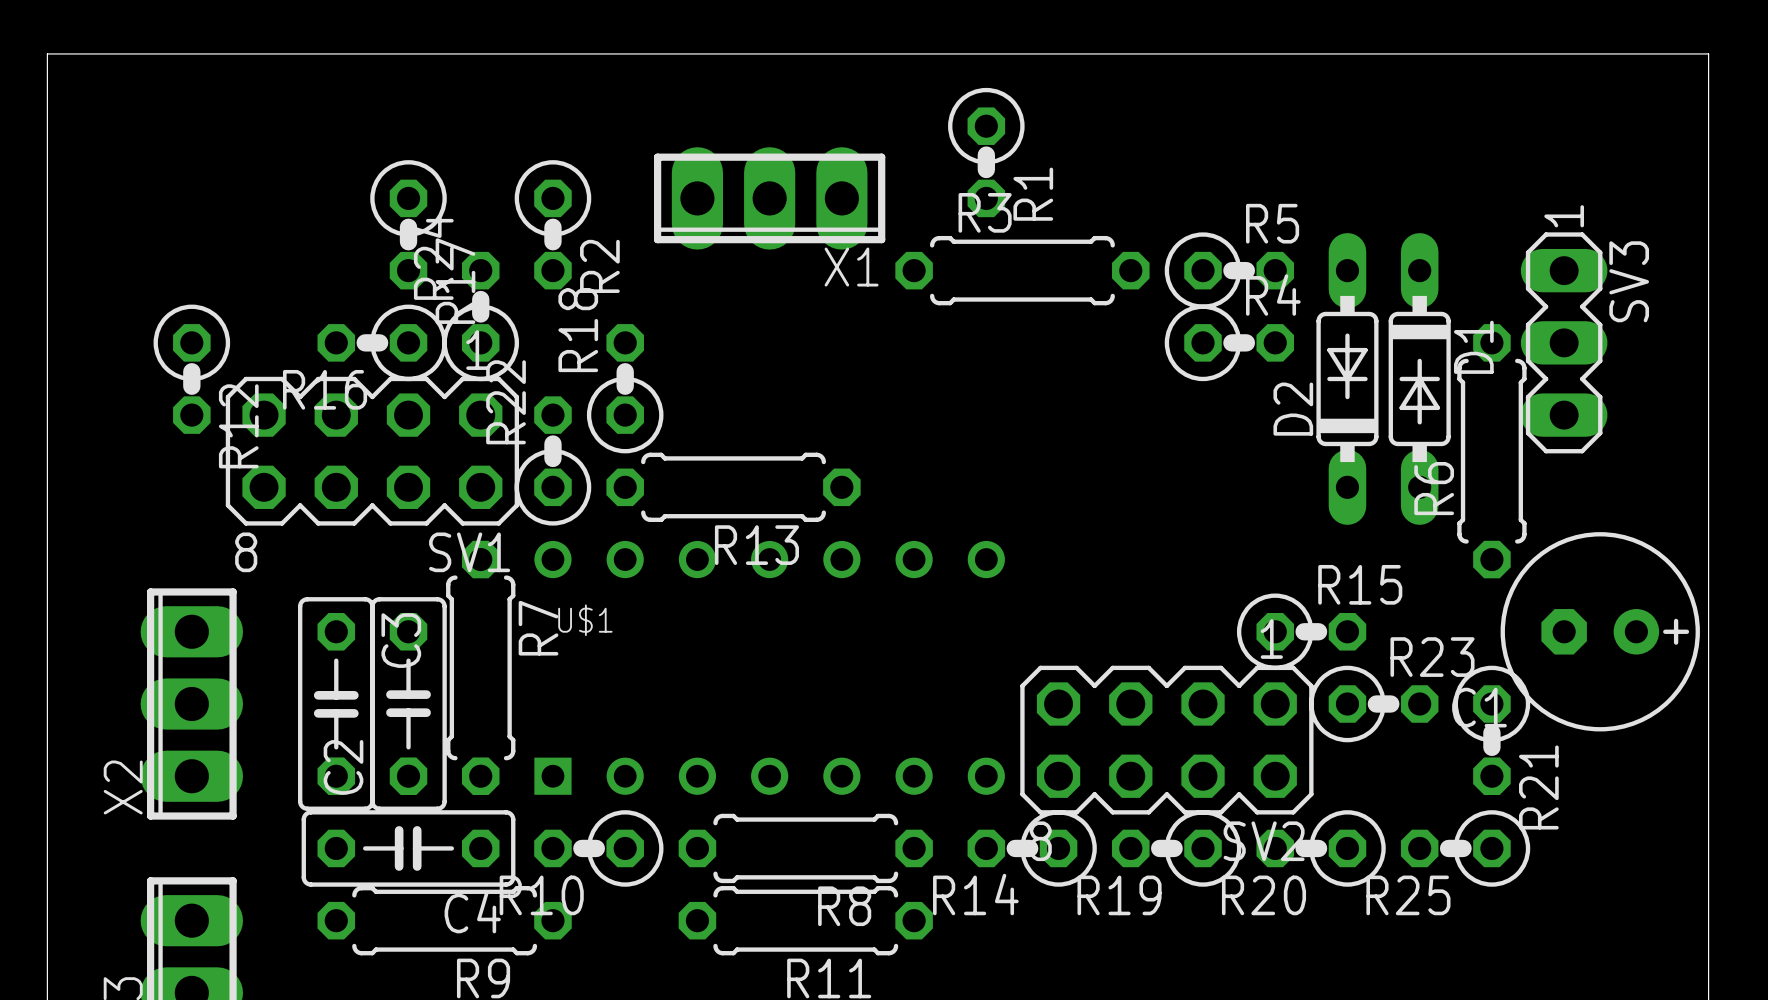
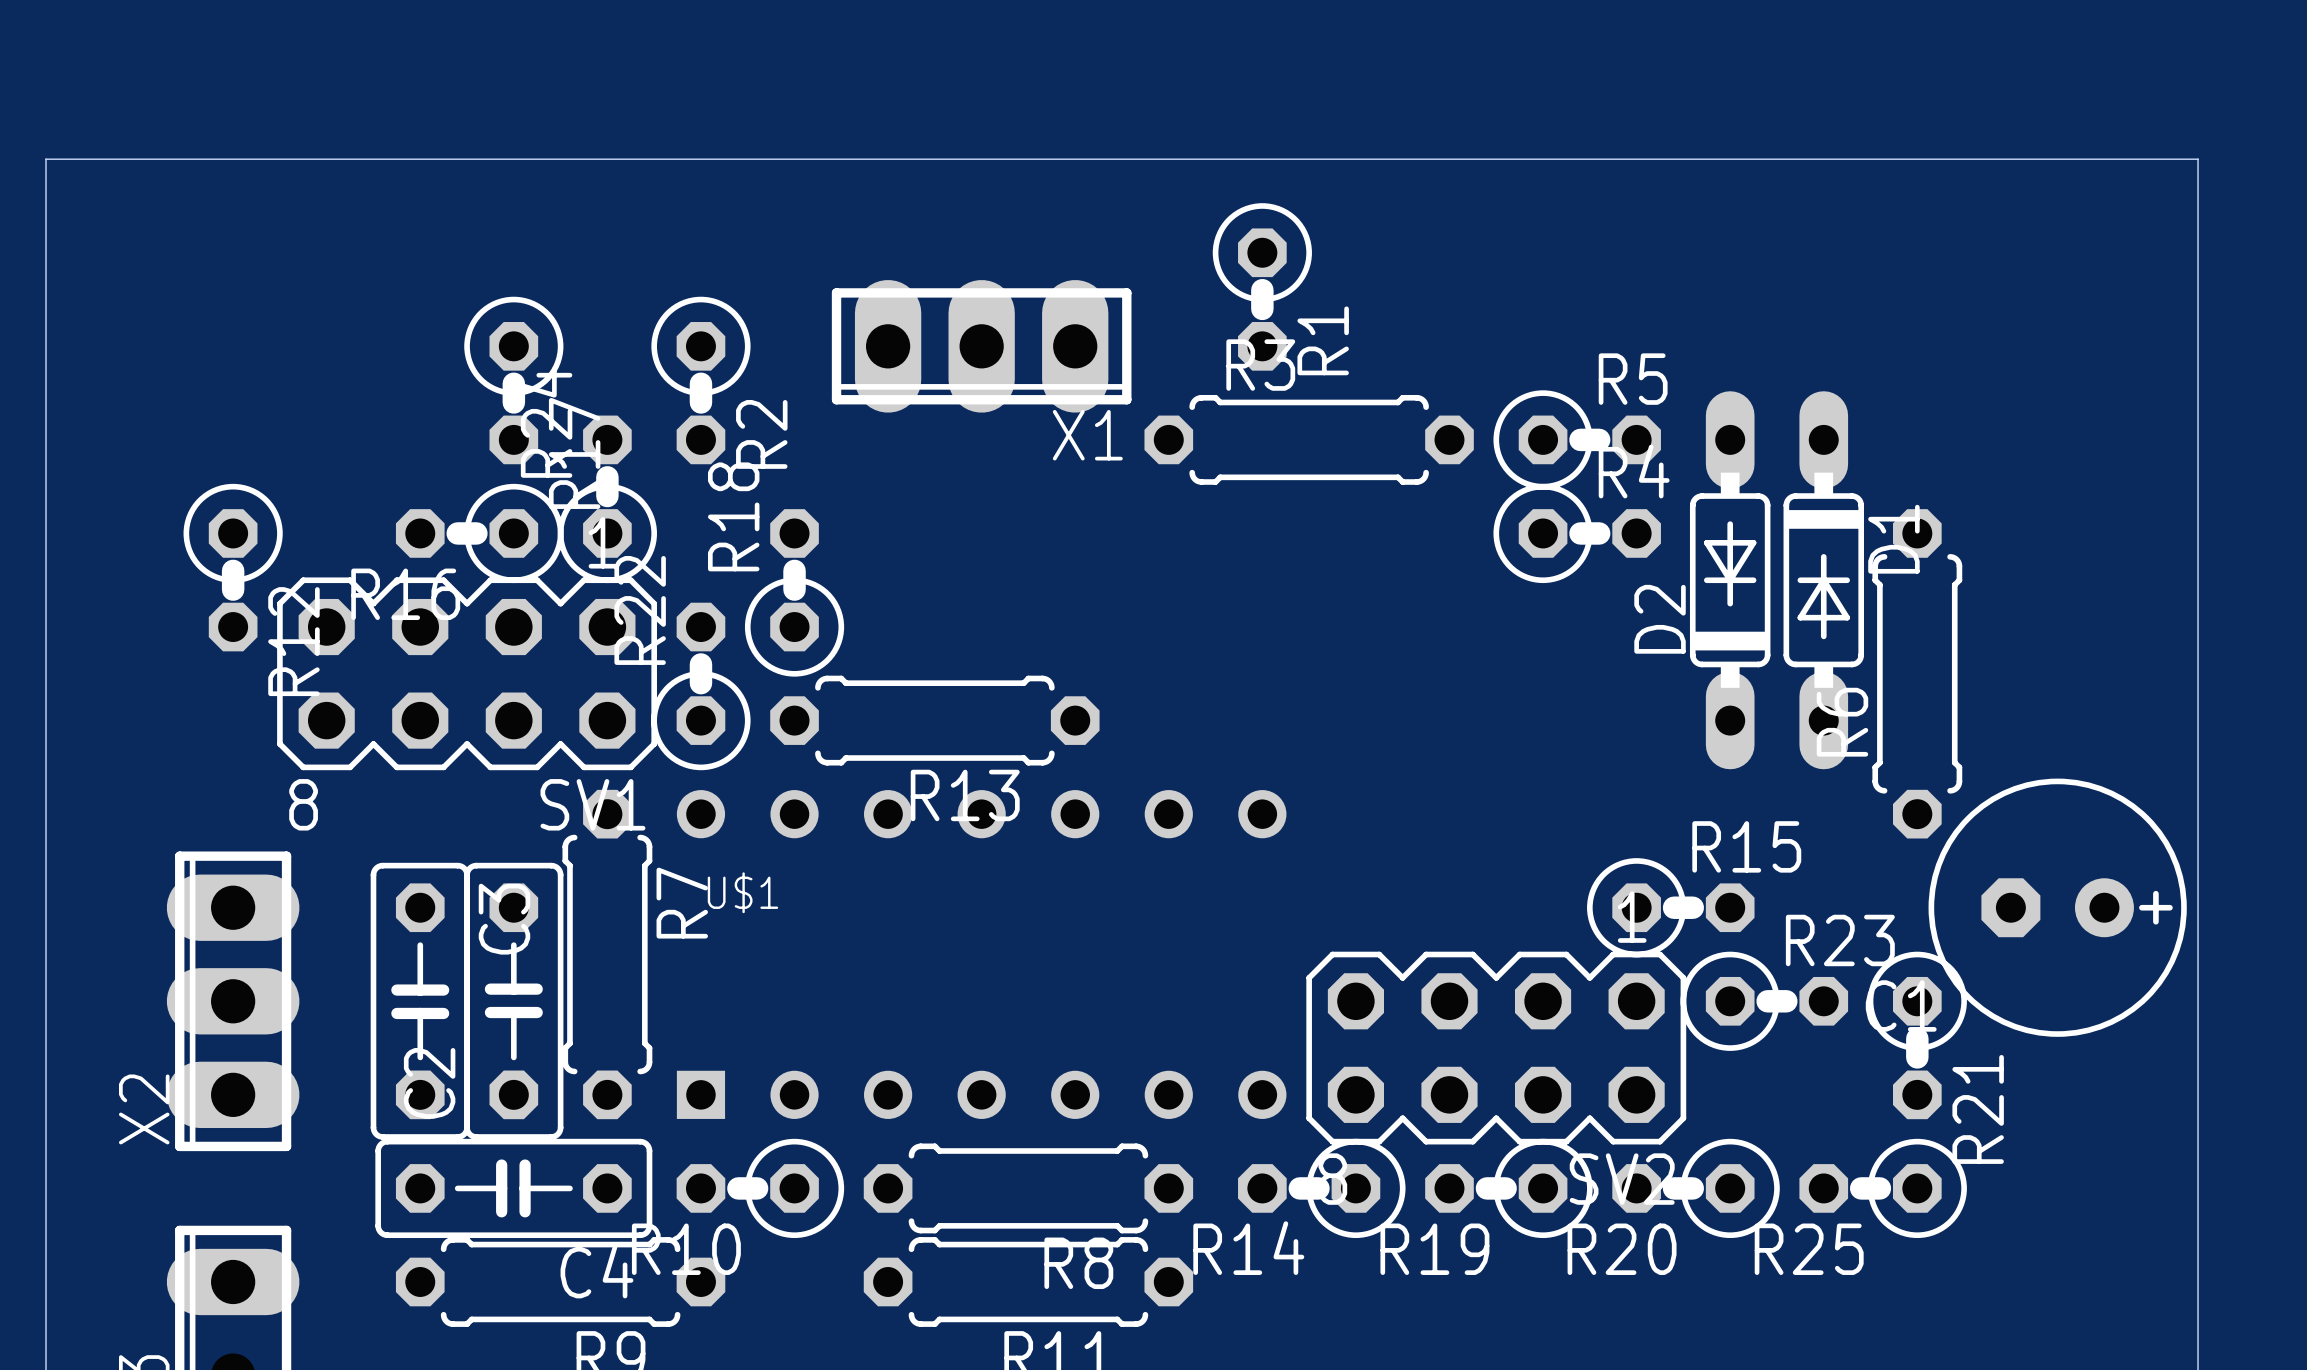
SV3: (1564, 342) -> none

